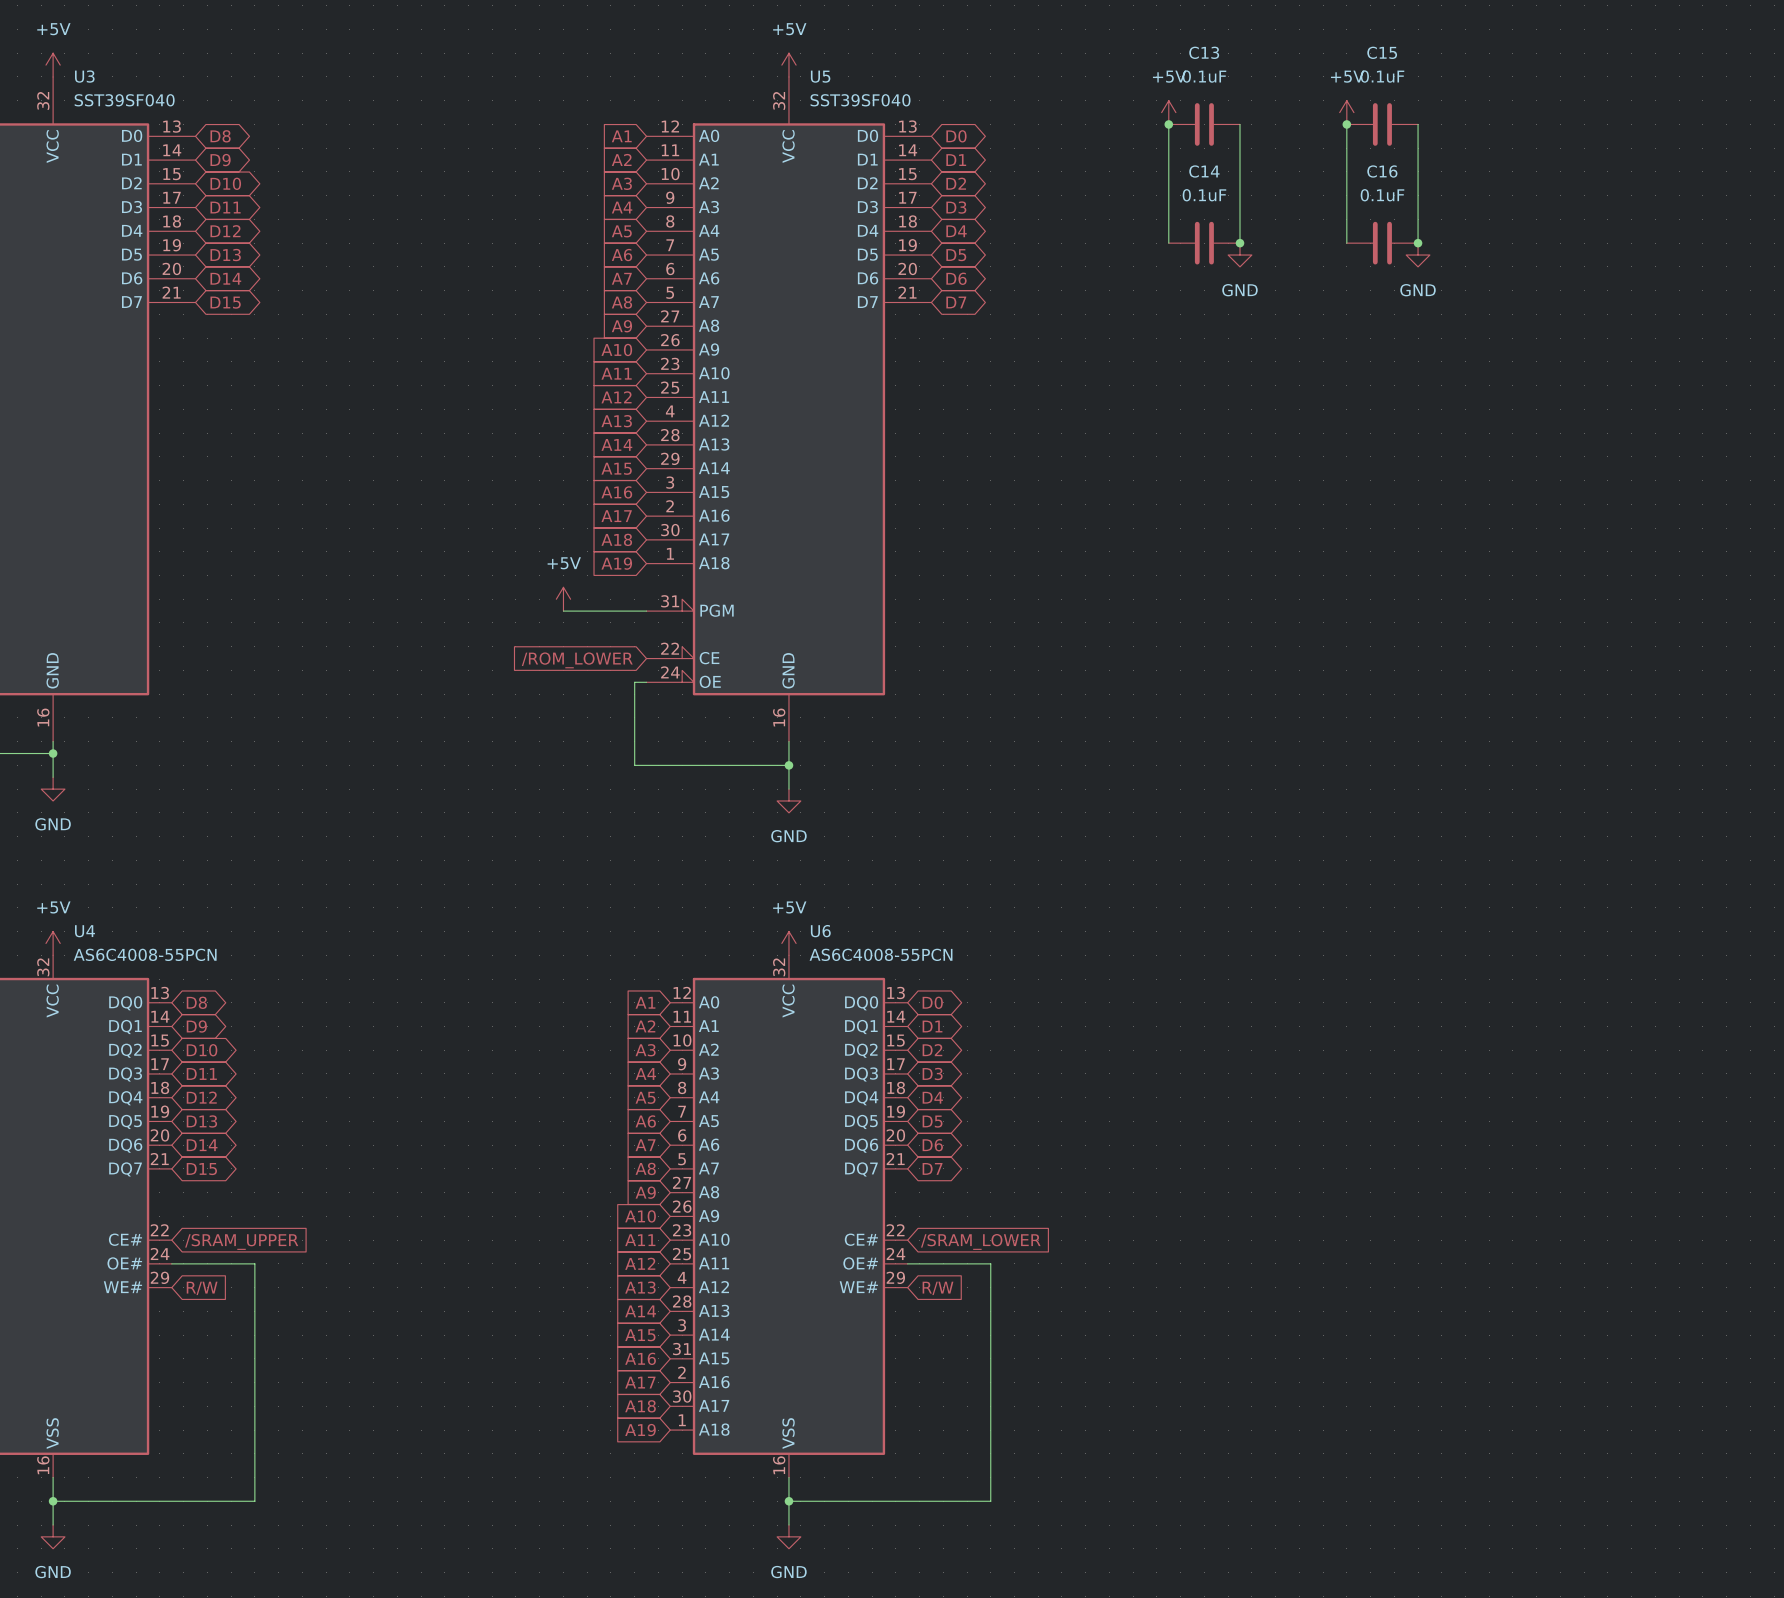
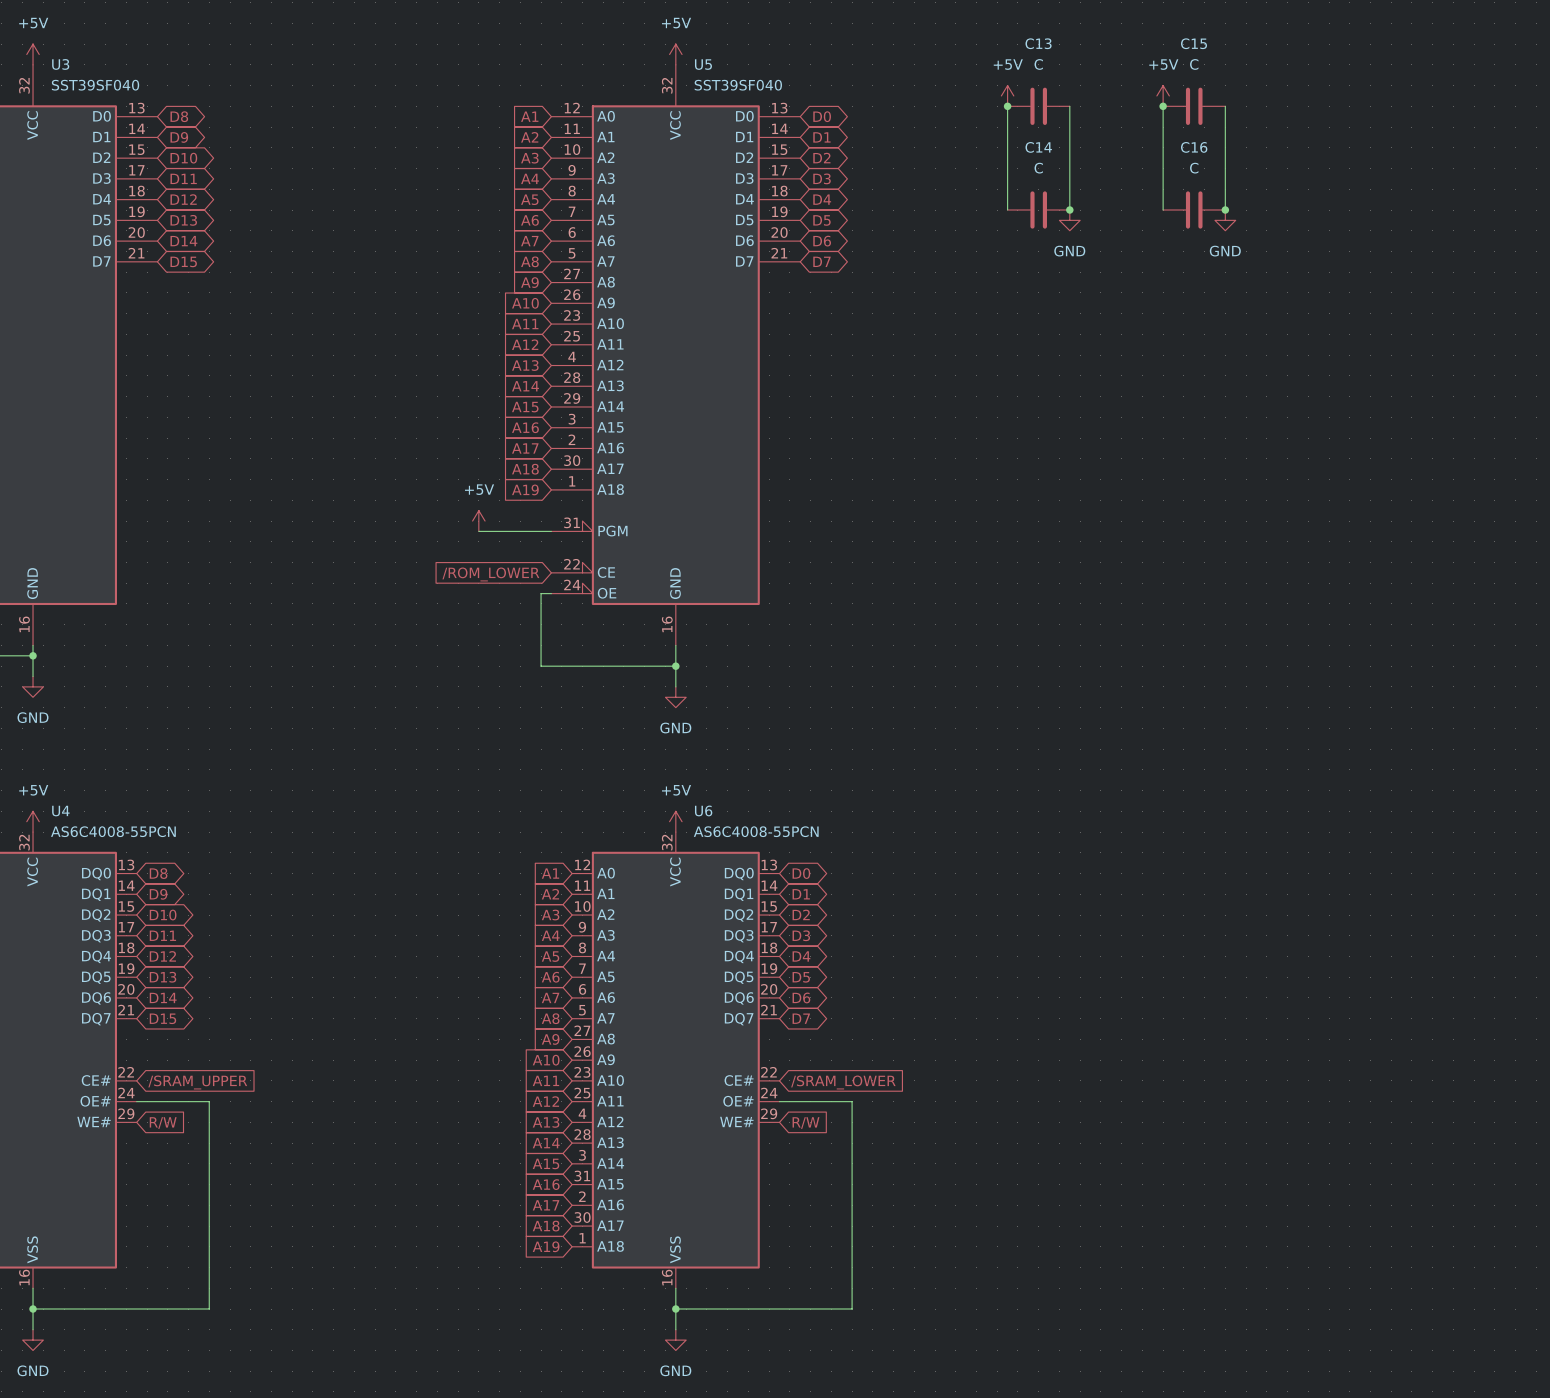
C13 value: 0.1uF (1204, 76) -> C (1038, 64)
C15 value: 0.1uF (1382, 76) -> C (1194, 64)
C14 value: 0.1uF (1204, 195) -> C (1038, 168)
C16 value: 0.1uF (1382, 195) -> C (1194, 168)

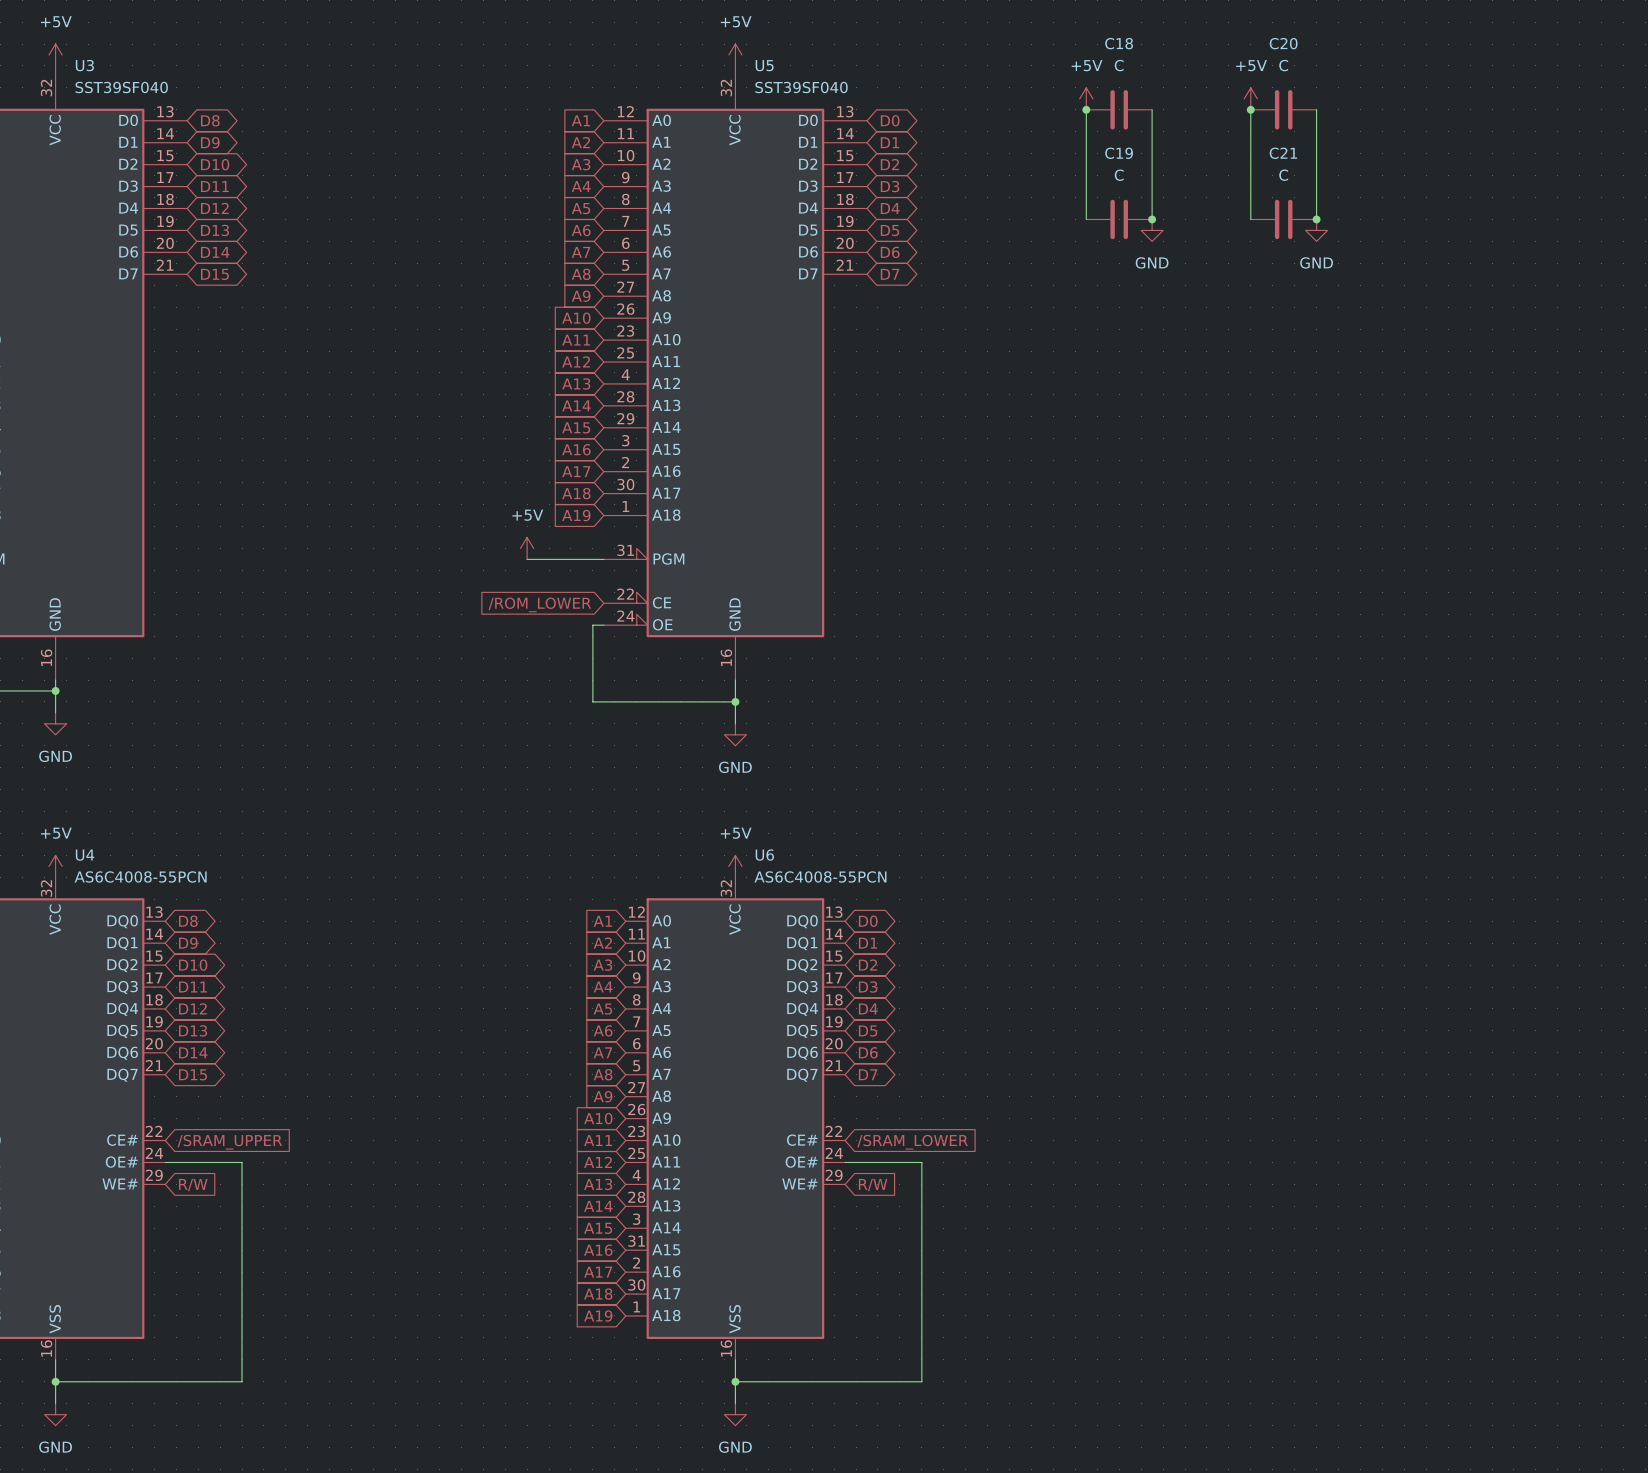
C13 name: C13 (1038, 43) -> C18 (1119, 43)
C15 name: C15 (1194, 43) -> C20 (1283, 43)
C14 name: C14 (1038, 147) -> C19 (1119, 153)
C16 name: C16 (1194, 147) -> C21 (1283, 153)

